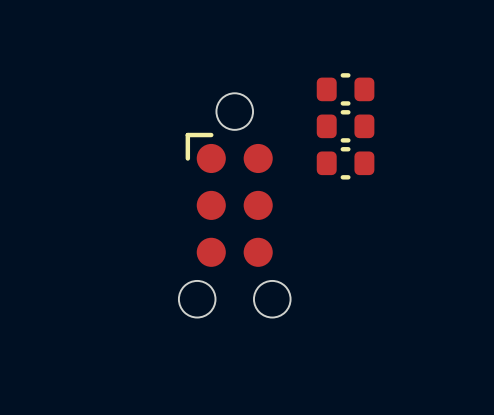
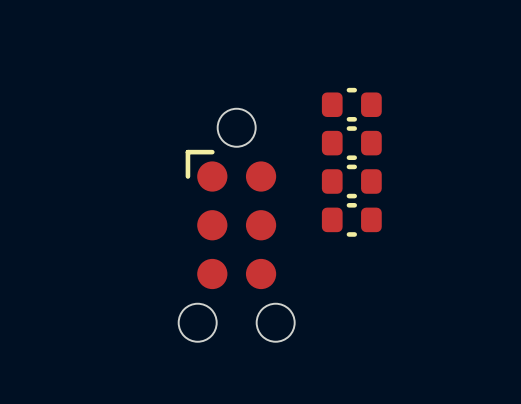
part: none -> (351, 219)

